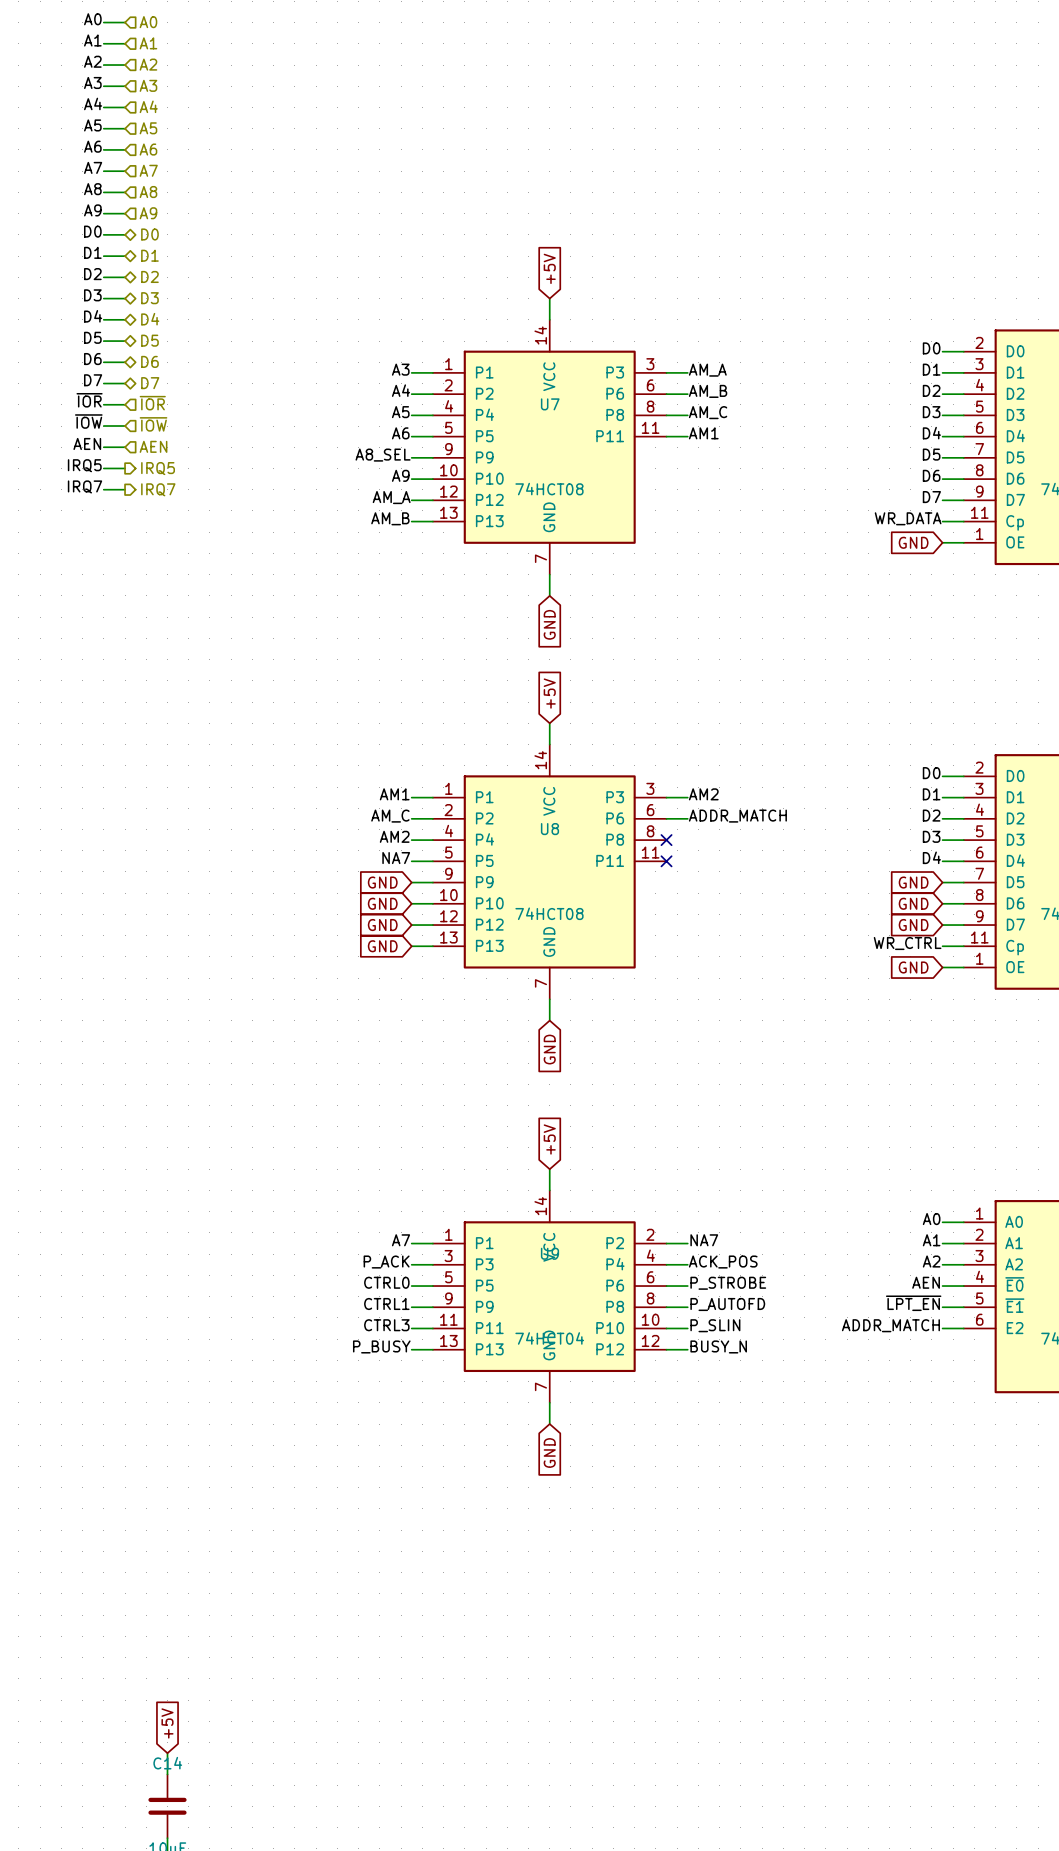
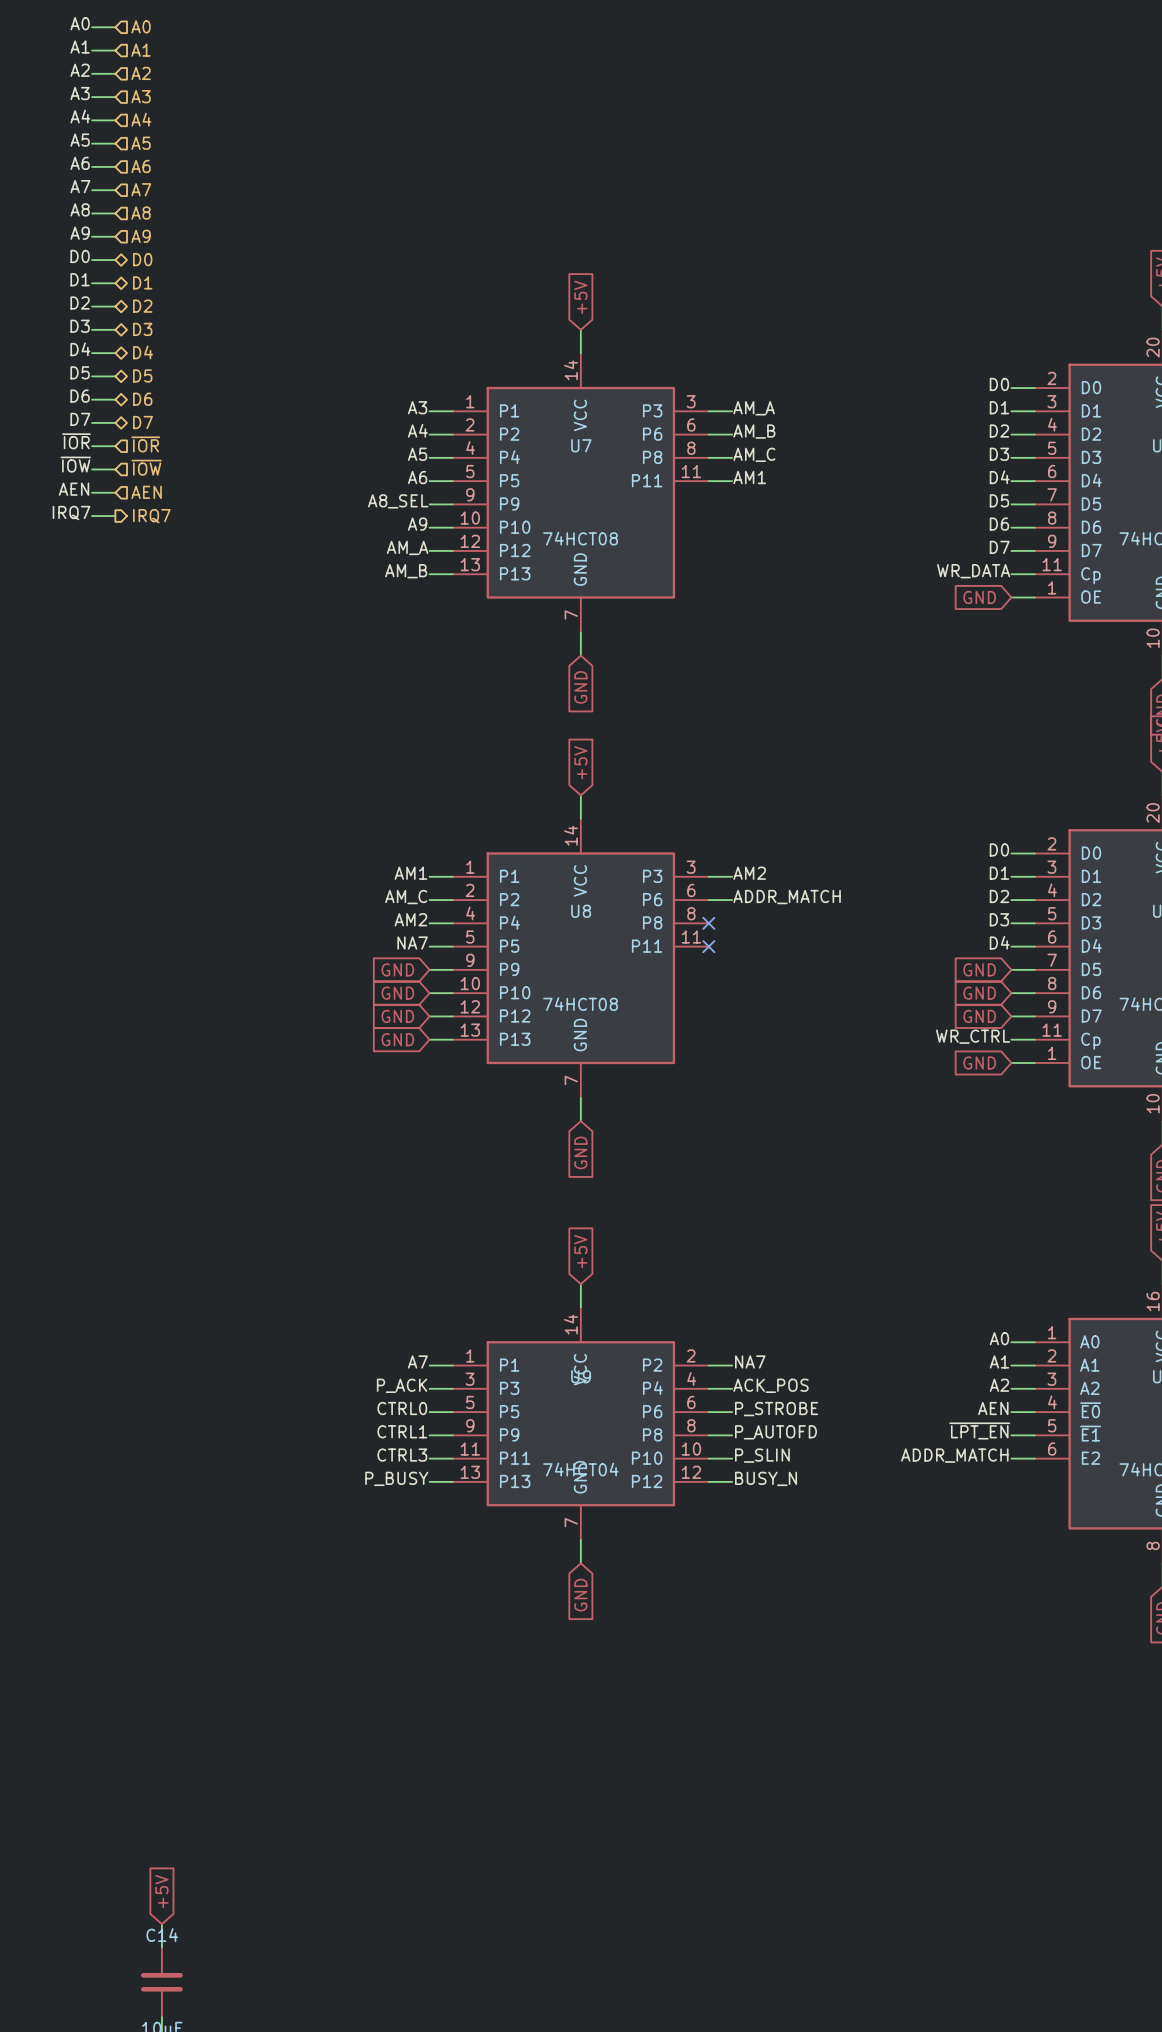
label: IRQ5 (84, 465) -> IRQ7 (71, 513)
hierarchical label: IRQ5 (158, 468) -> IRQ7 (151, 516)
label: IRQ7 (85, 486) -> none
wire: (103, 489) (125, 489) -> none
hierarchical label: IRQ7 (158, 489) -> none

